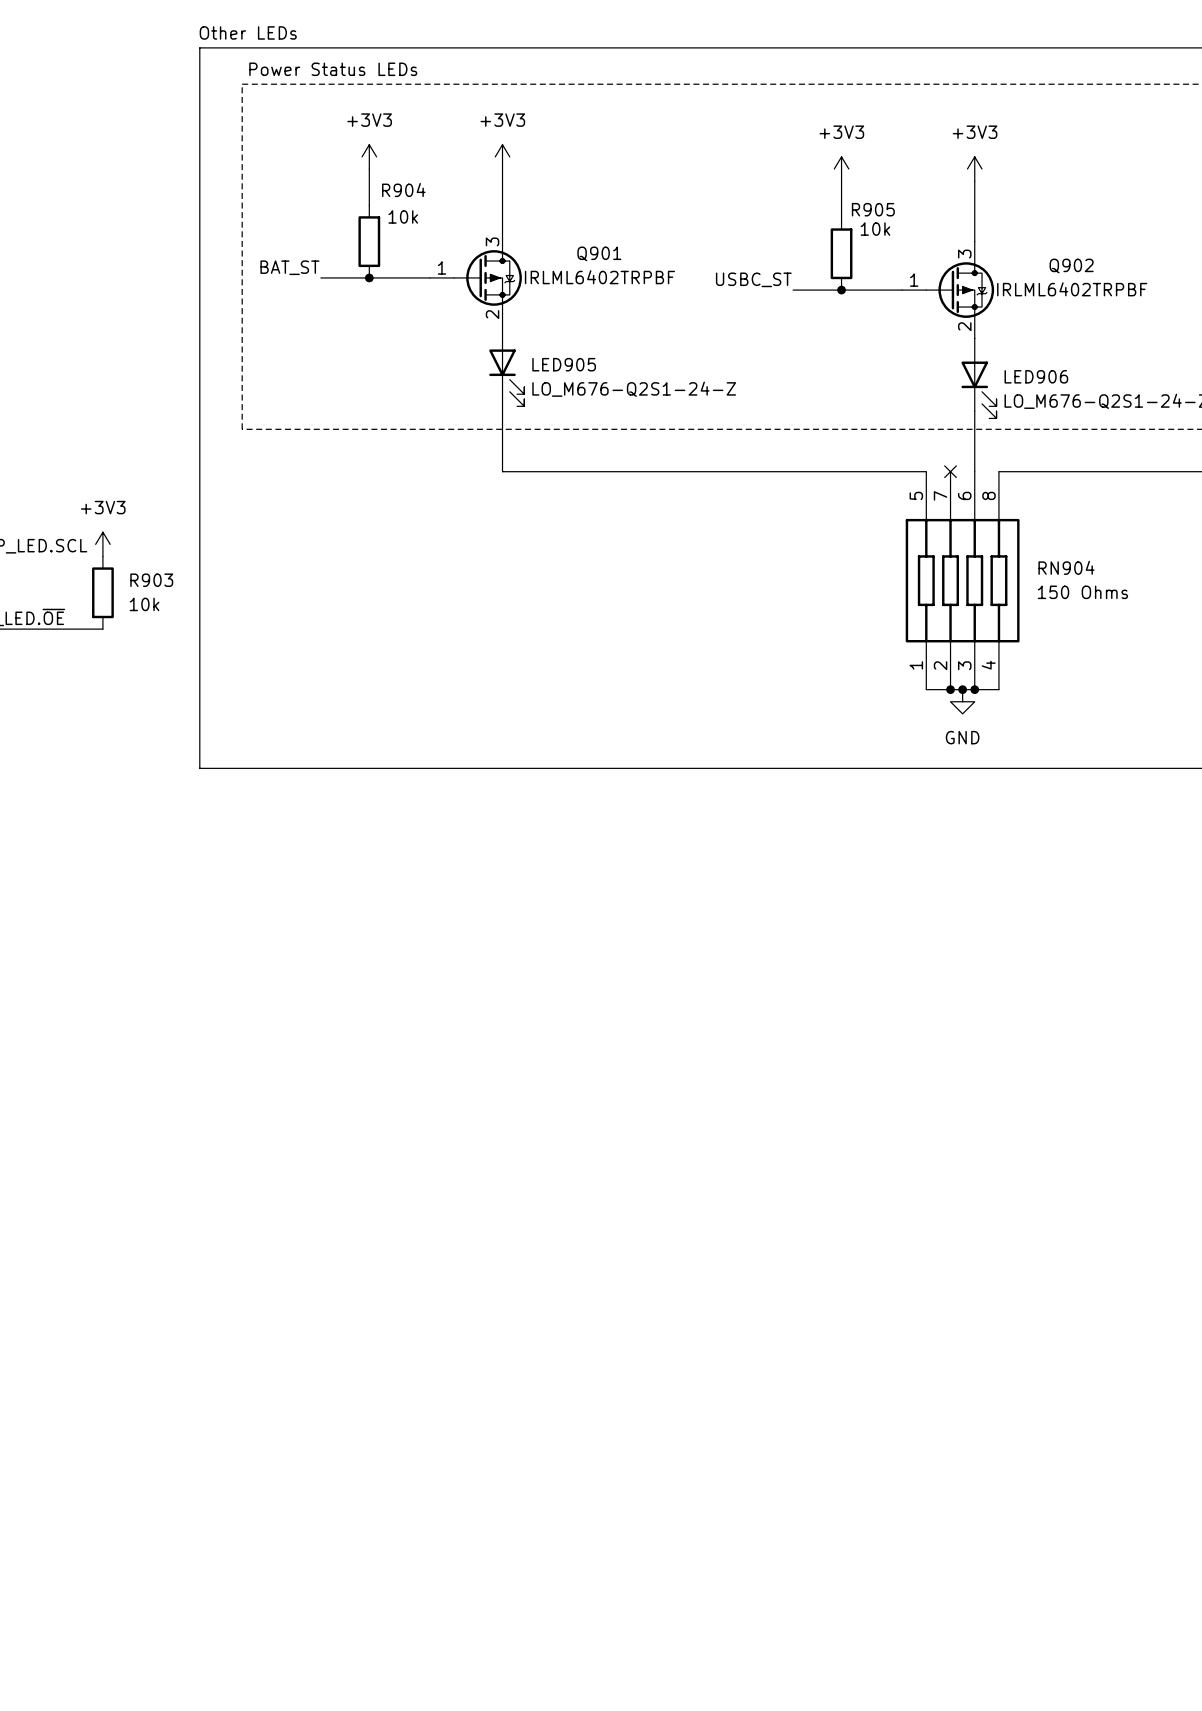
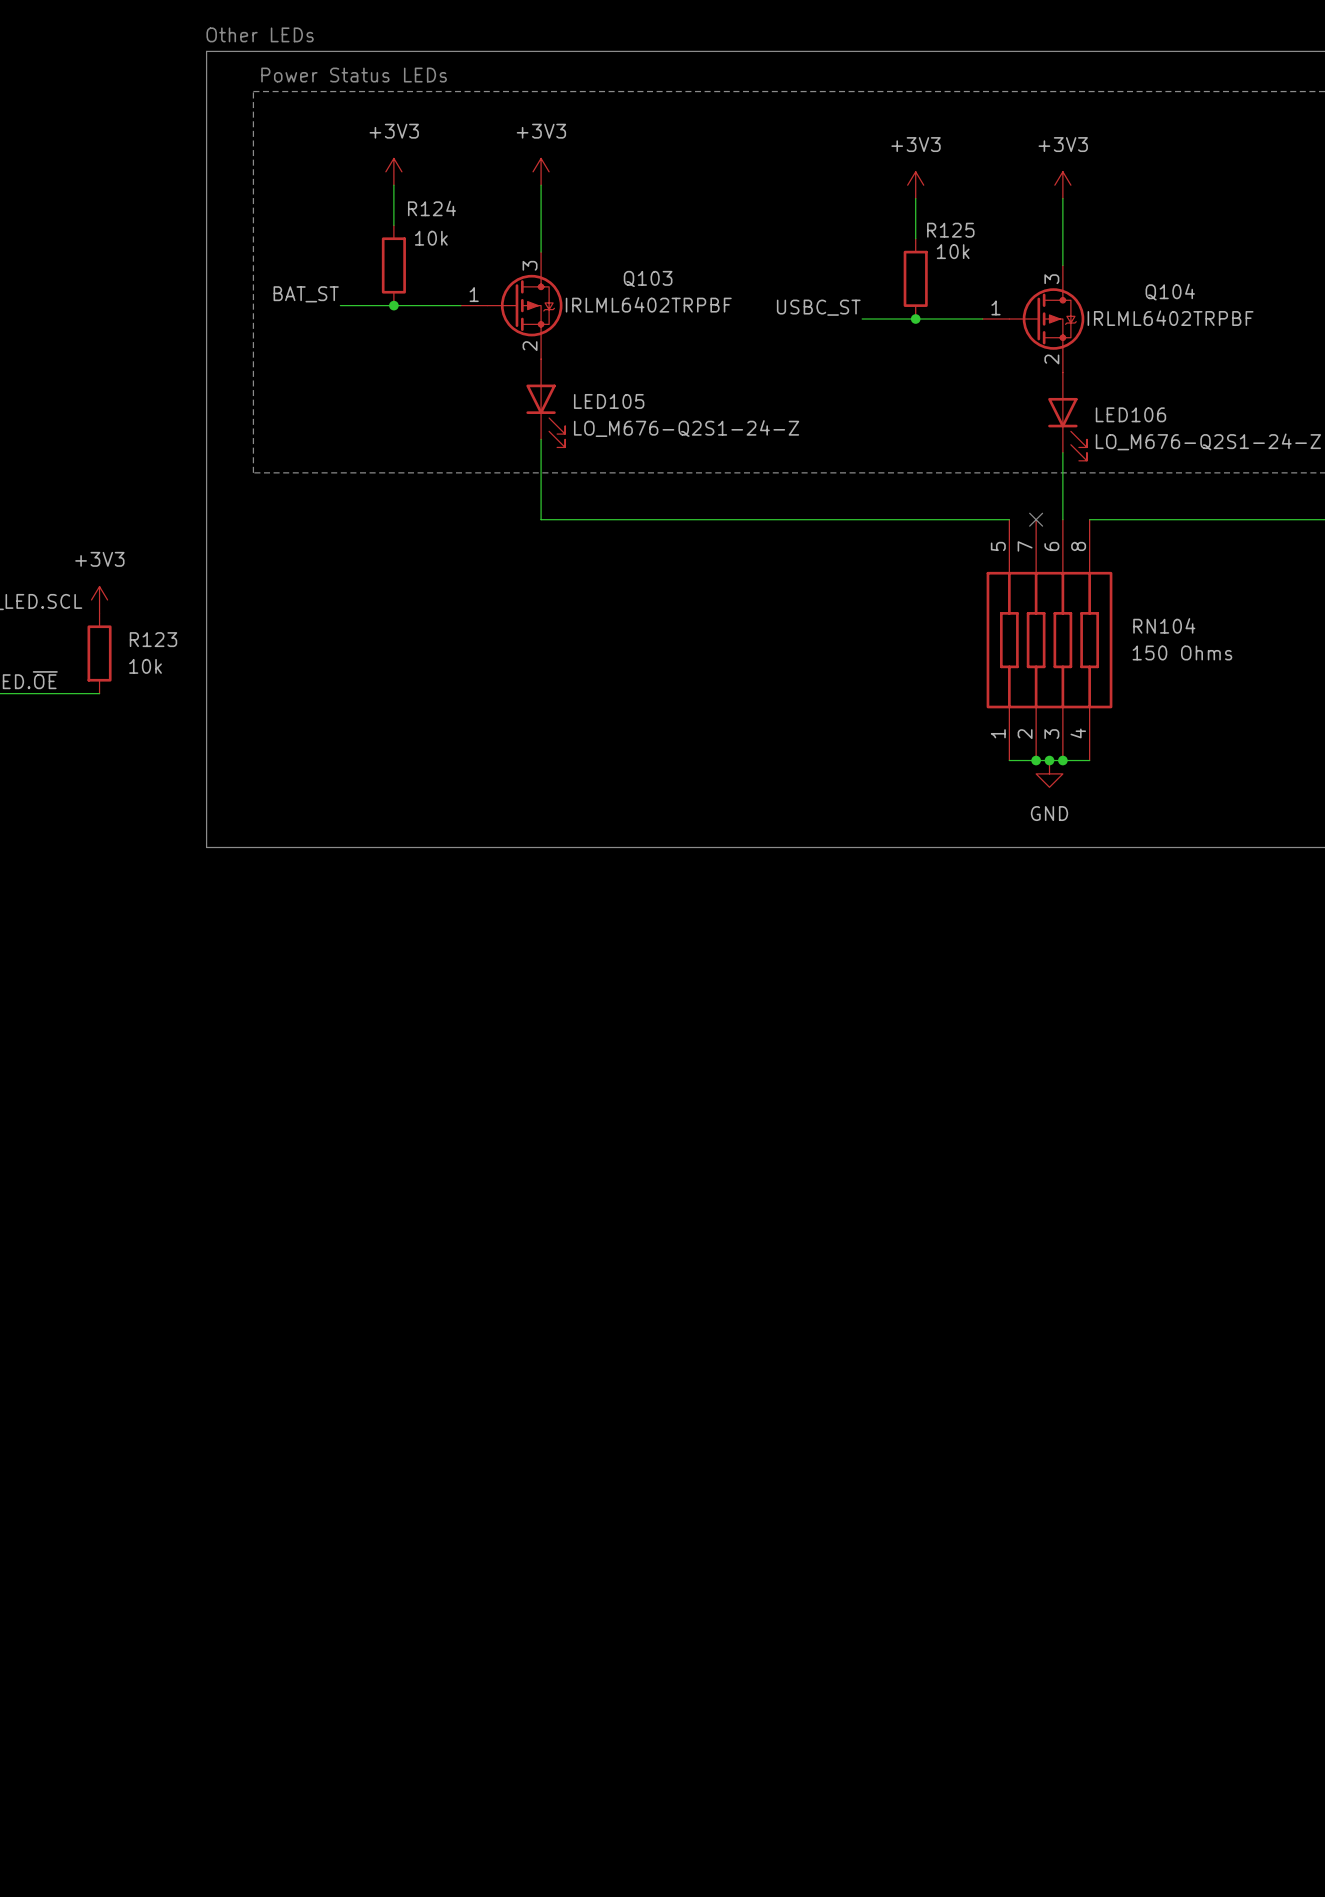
R904 name: R904 (403, 190) -> R124 (432, 208)
R905 name: R905 (873, 209) -> R125 (950, 230)
Q901 name: Q901 (599, 253) -> Q103 (648, 279)
Q902 name: Q902 (1071, 265) -> Q104 (1170, 292)
LED905 name: LED905 (564, 364) -> LED105 (609, 401)
LED906 name: LED906 (1036, 376) -> LED106 (1130, 414)
RN904 name: RN904 (1066, 567) -> RN104 (1164, 625)
R903 name: R903 (151, 580) -> R123 (153, 639)

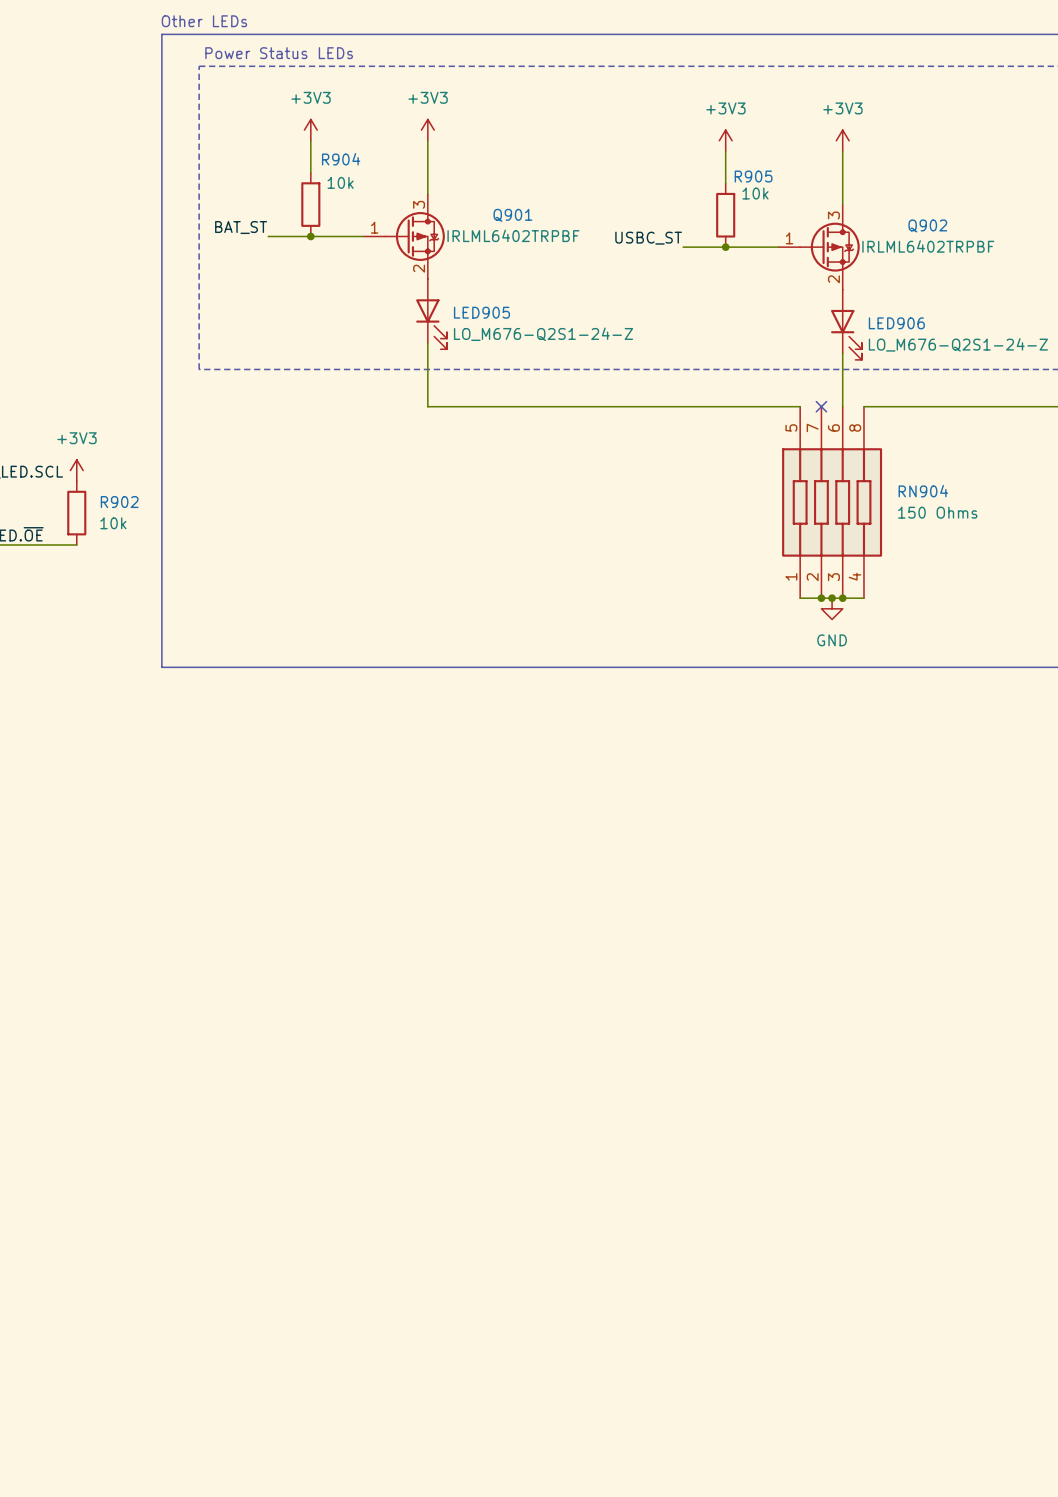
R124 name: R124 (432, 208) -> R904 (341, 159)
R125 name: R125 (950, 230) -> R905 (753, 176)
Q103 name: Q103 (648, 279) -> Q901 (512, 215)
Q104 name: Q104 (1170, 292) -> Q902 (927, 225)
LED105 name: LED105 (609, 401) -> LED905 (481, 312)
LED106 name: LED106 (1130, 414) -> LED906 (896, 323)
RN104 name: RN104 (1164, 625) -> RN904 (923, 491)
R123 name: R123 (153, 639) -> R902 (119, 502)

